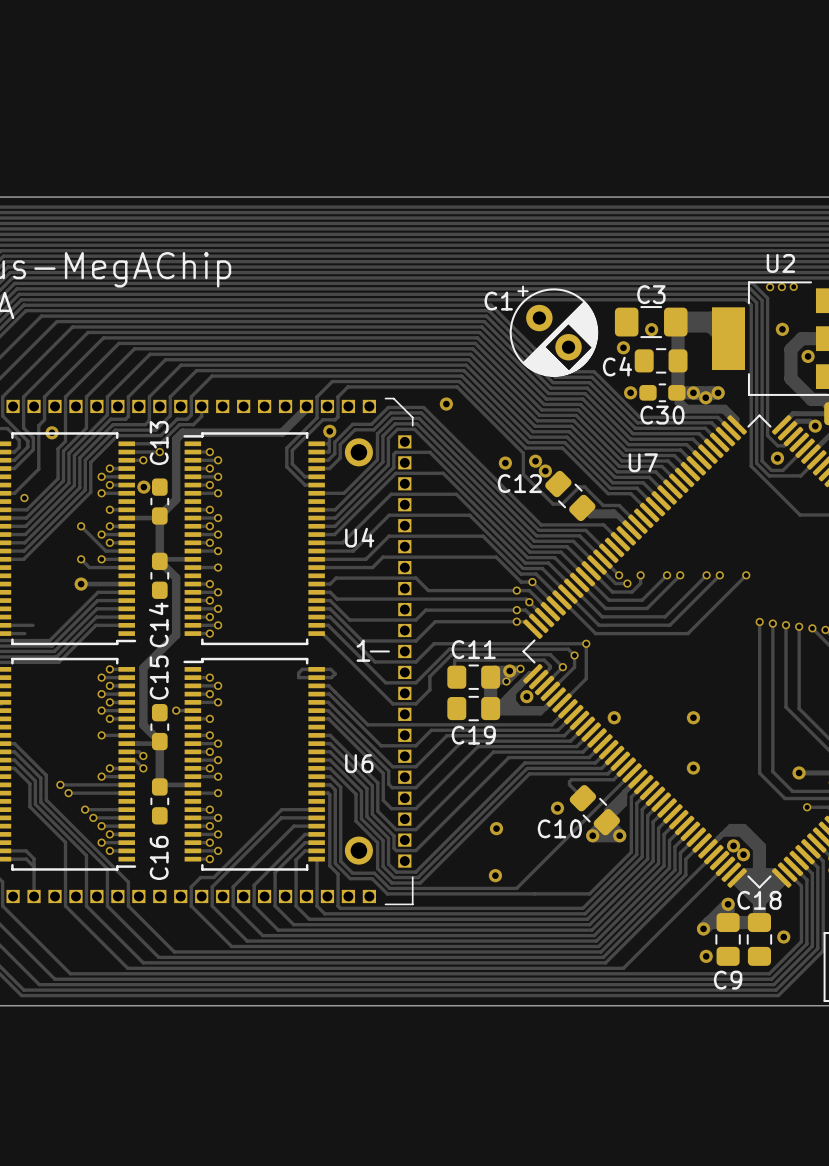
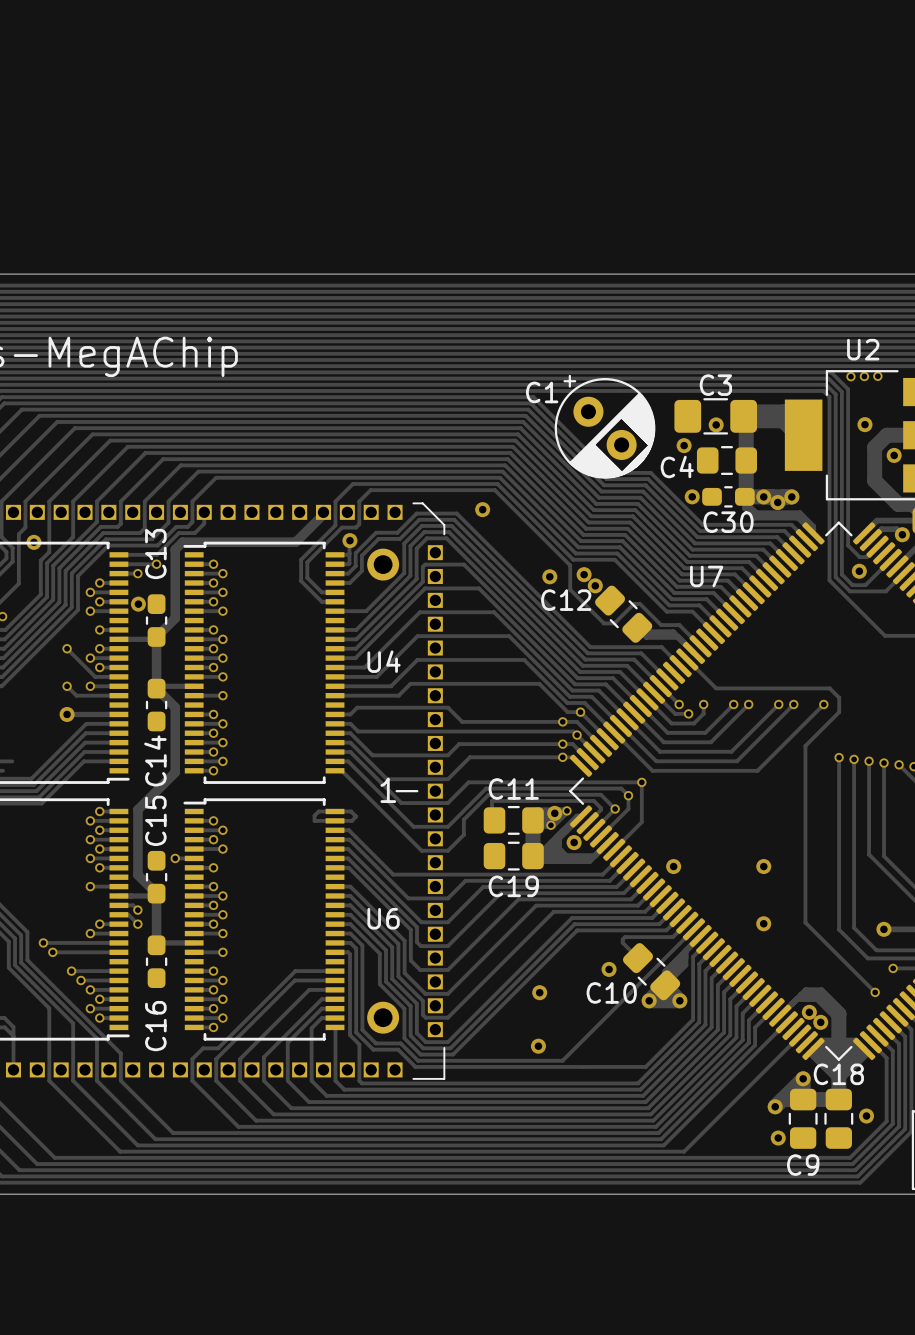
track: none -> (687, 659) (716, 688) (829, 688) (839, 697) (839, 712) (805, 745) (805, 922) (875, 992)
via: none -> (875, 992)

